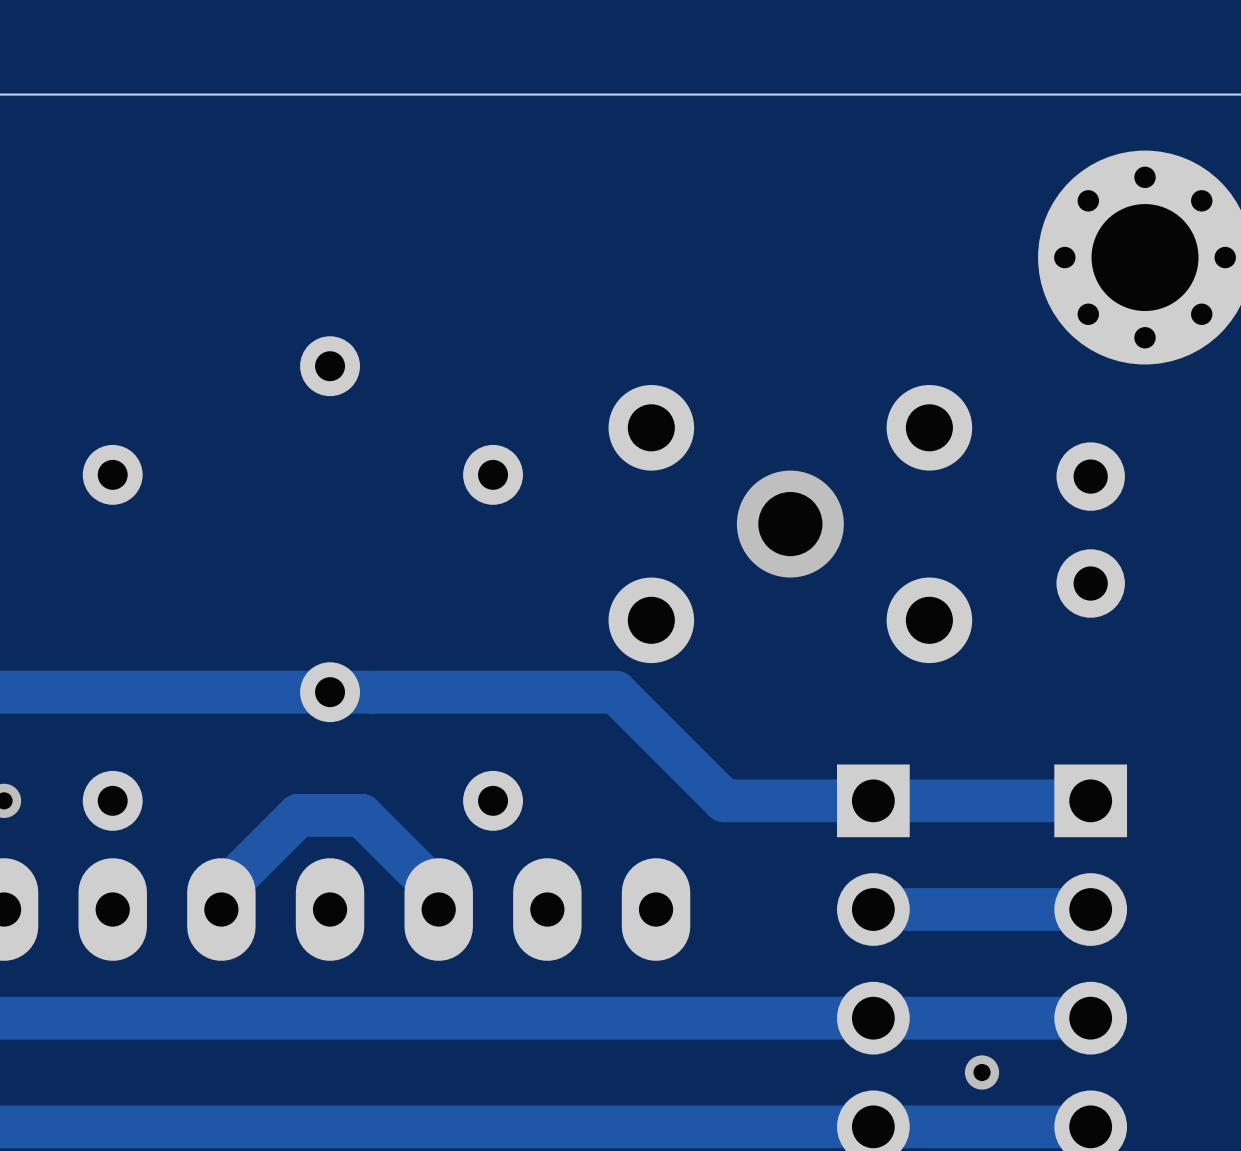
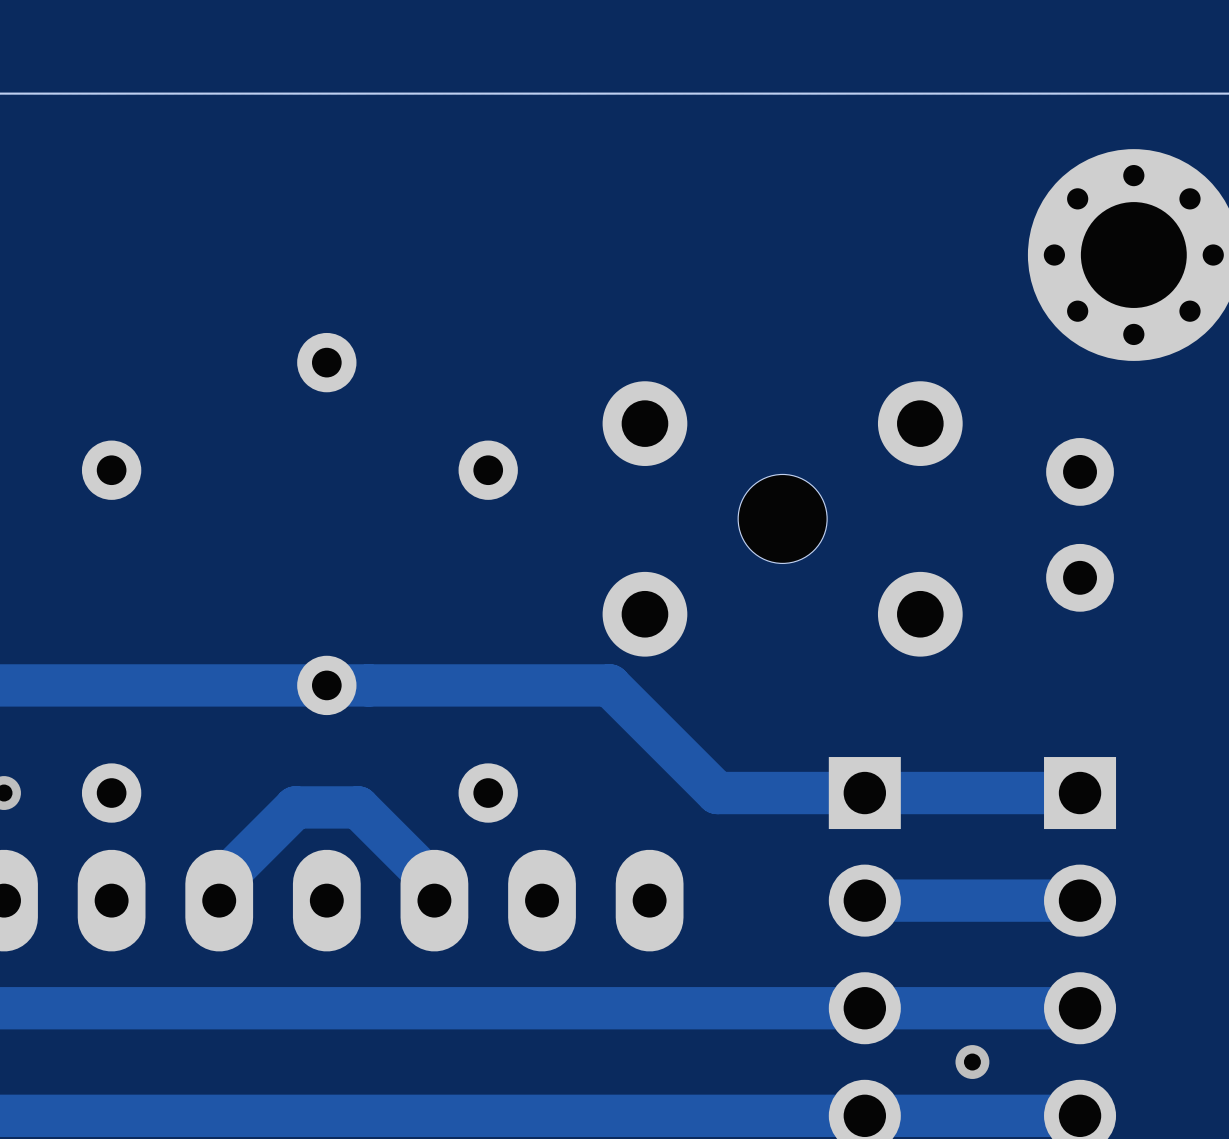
via: (790, 524) -> none
part: none -> (782, 518)

